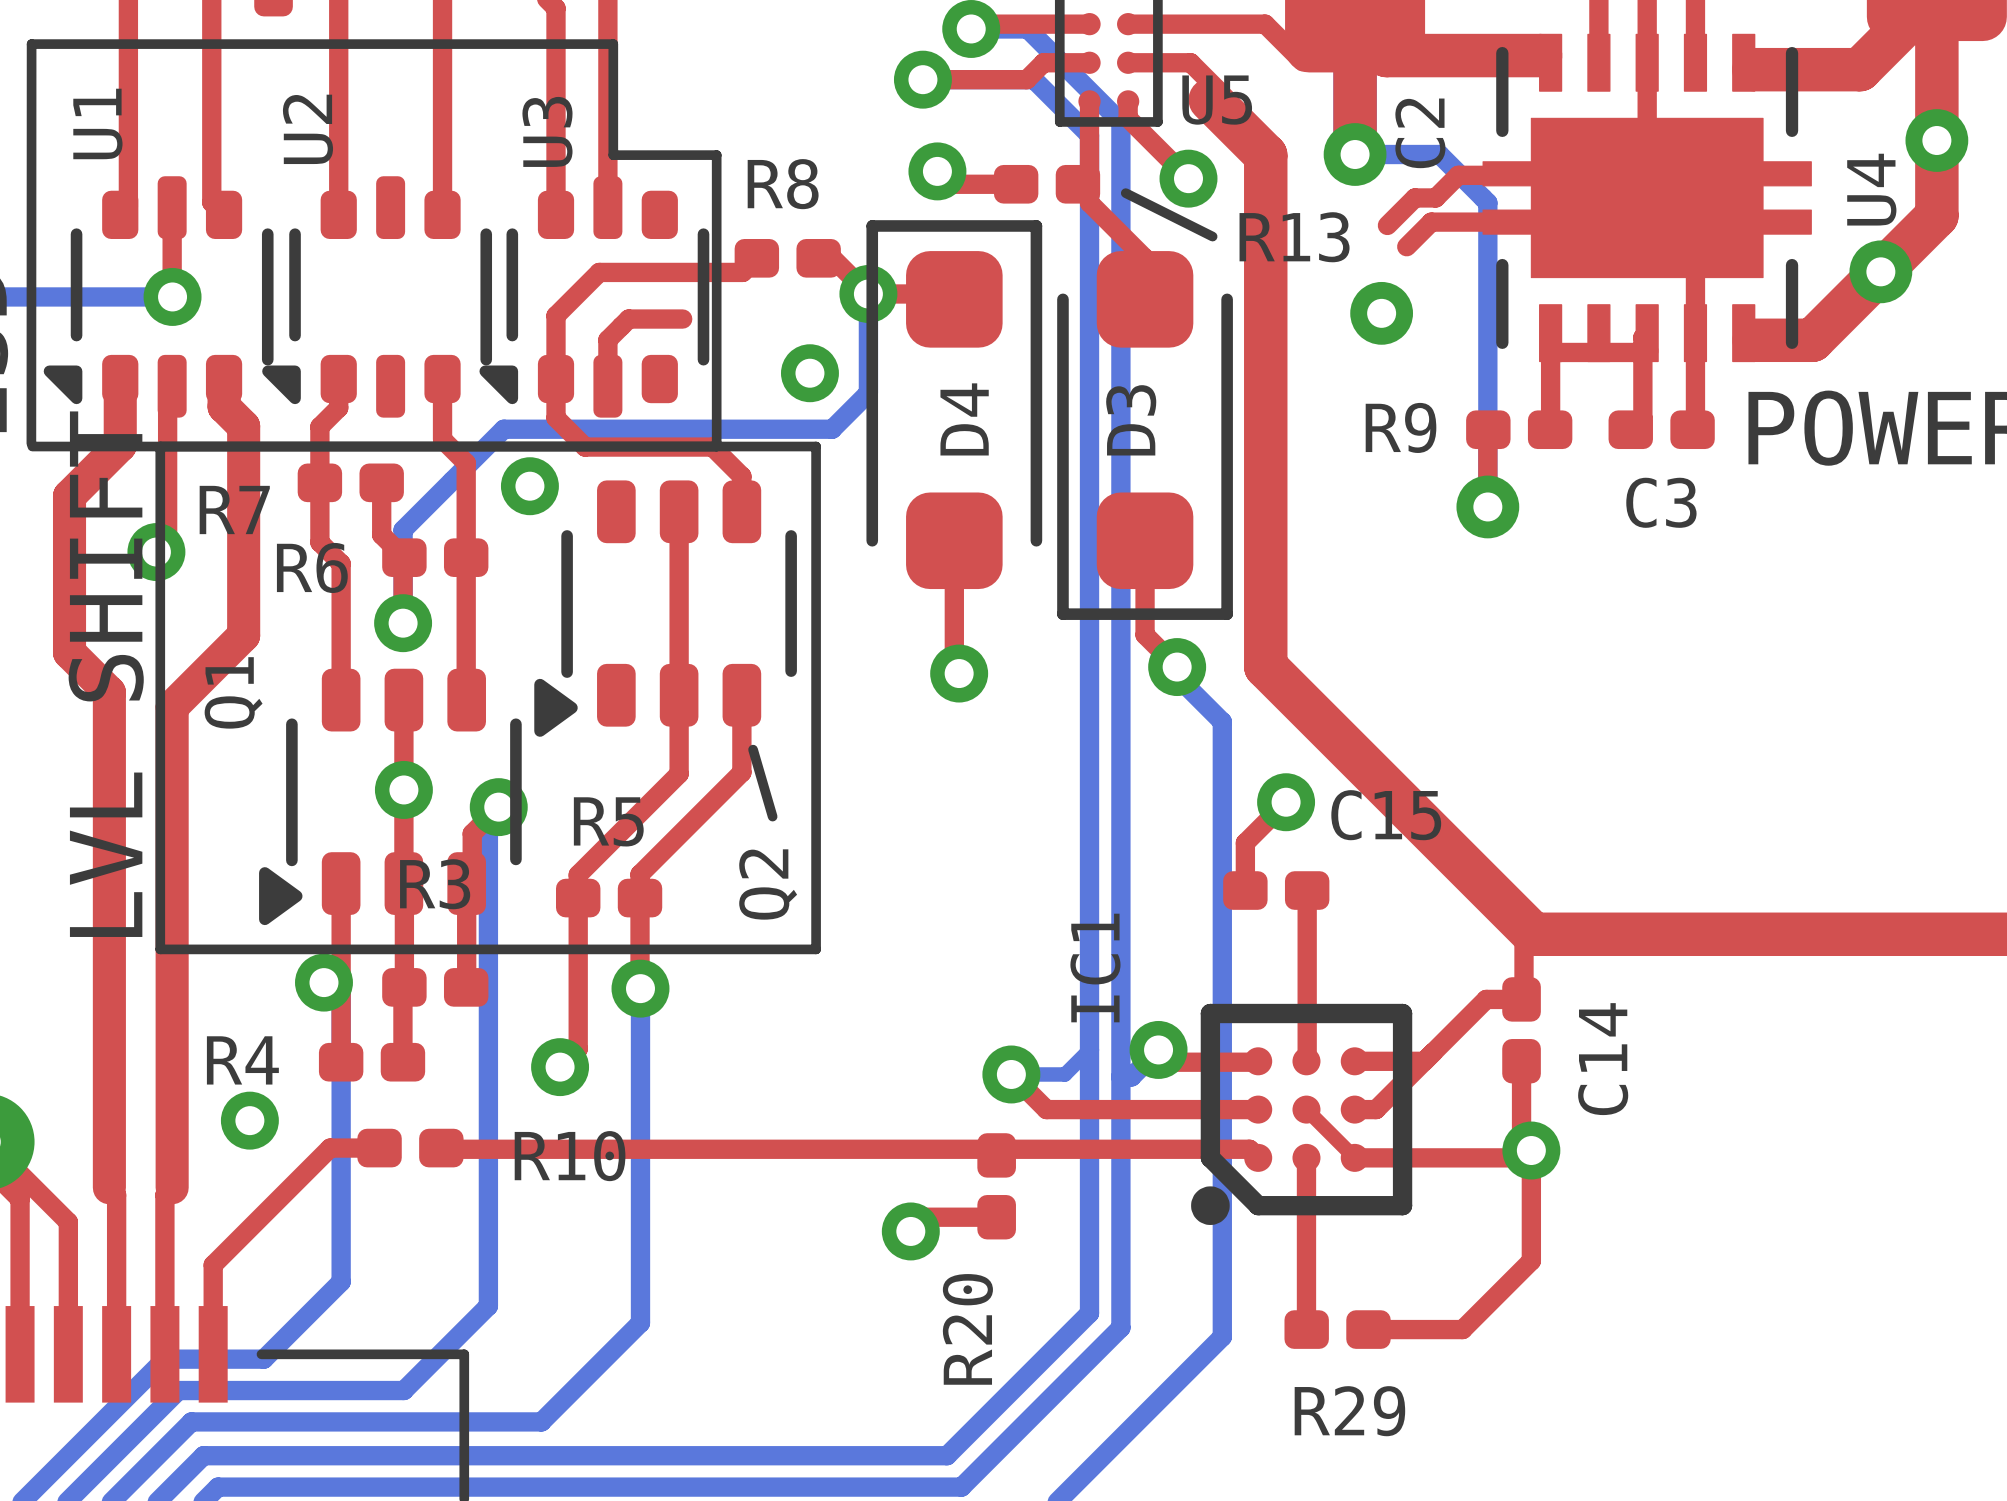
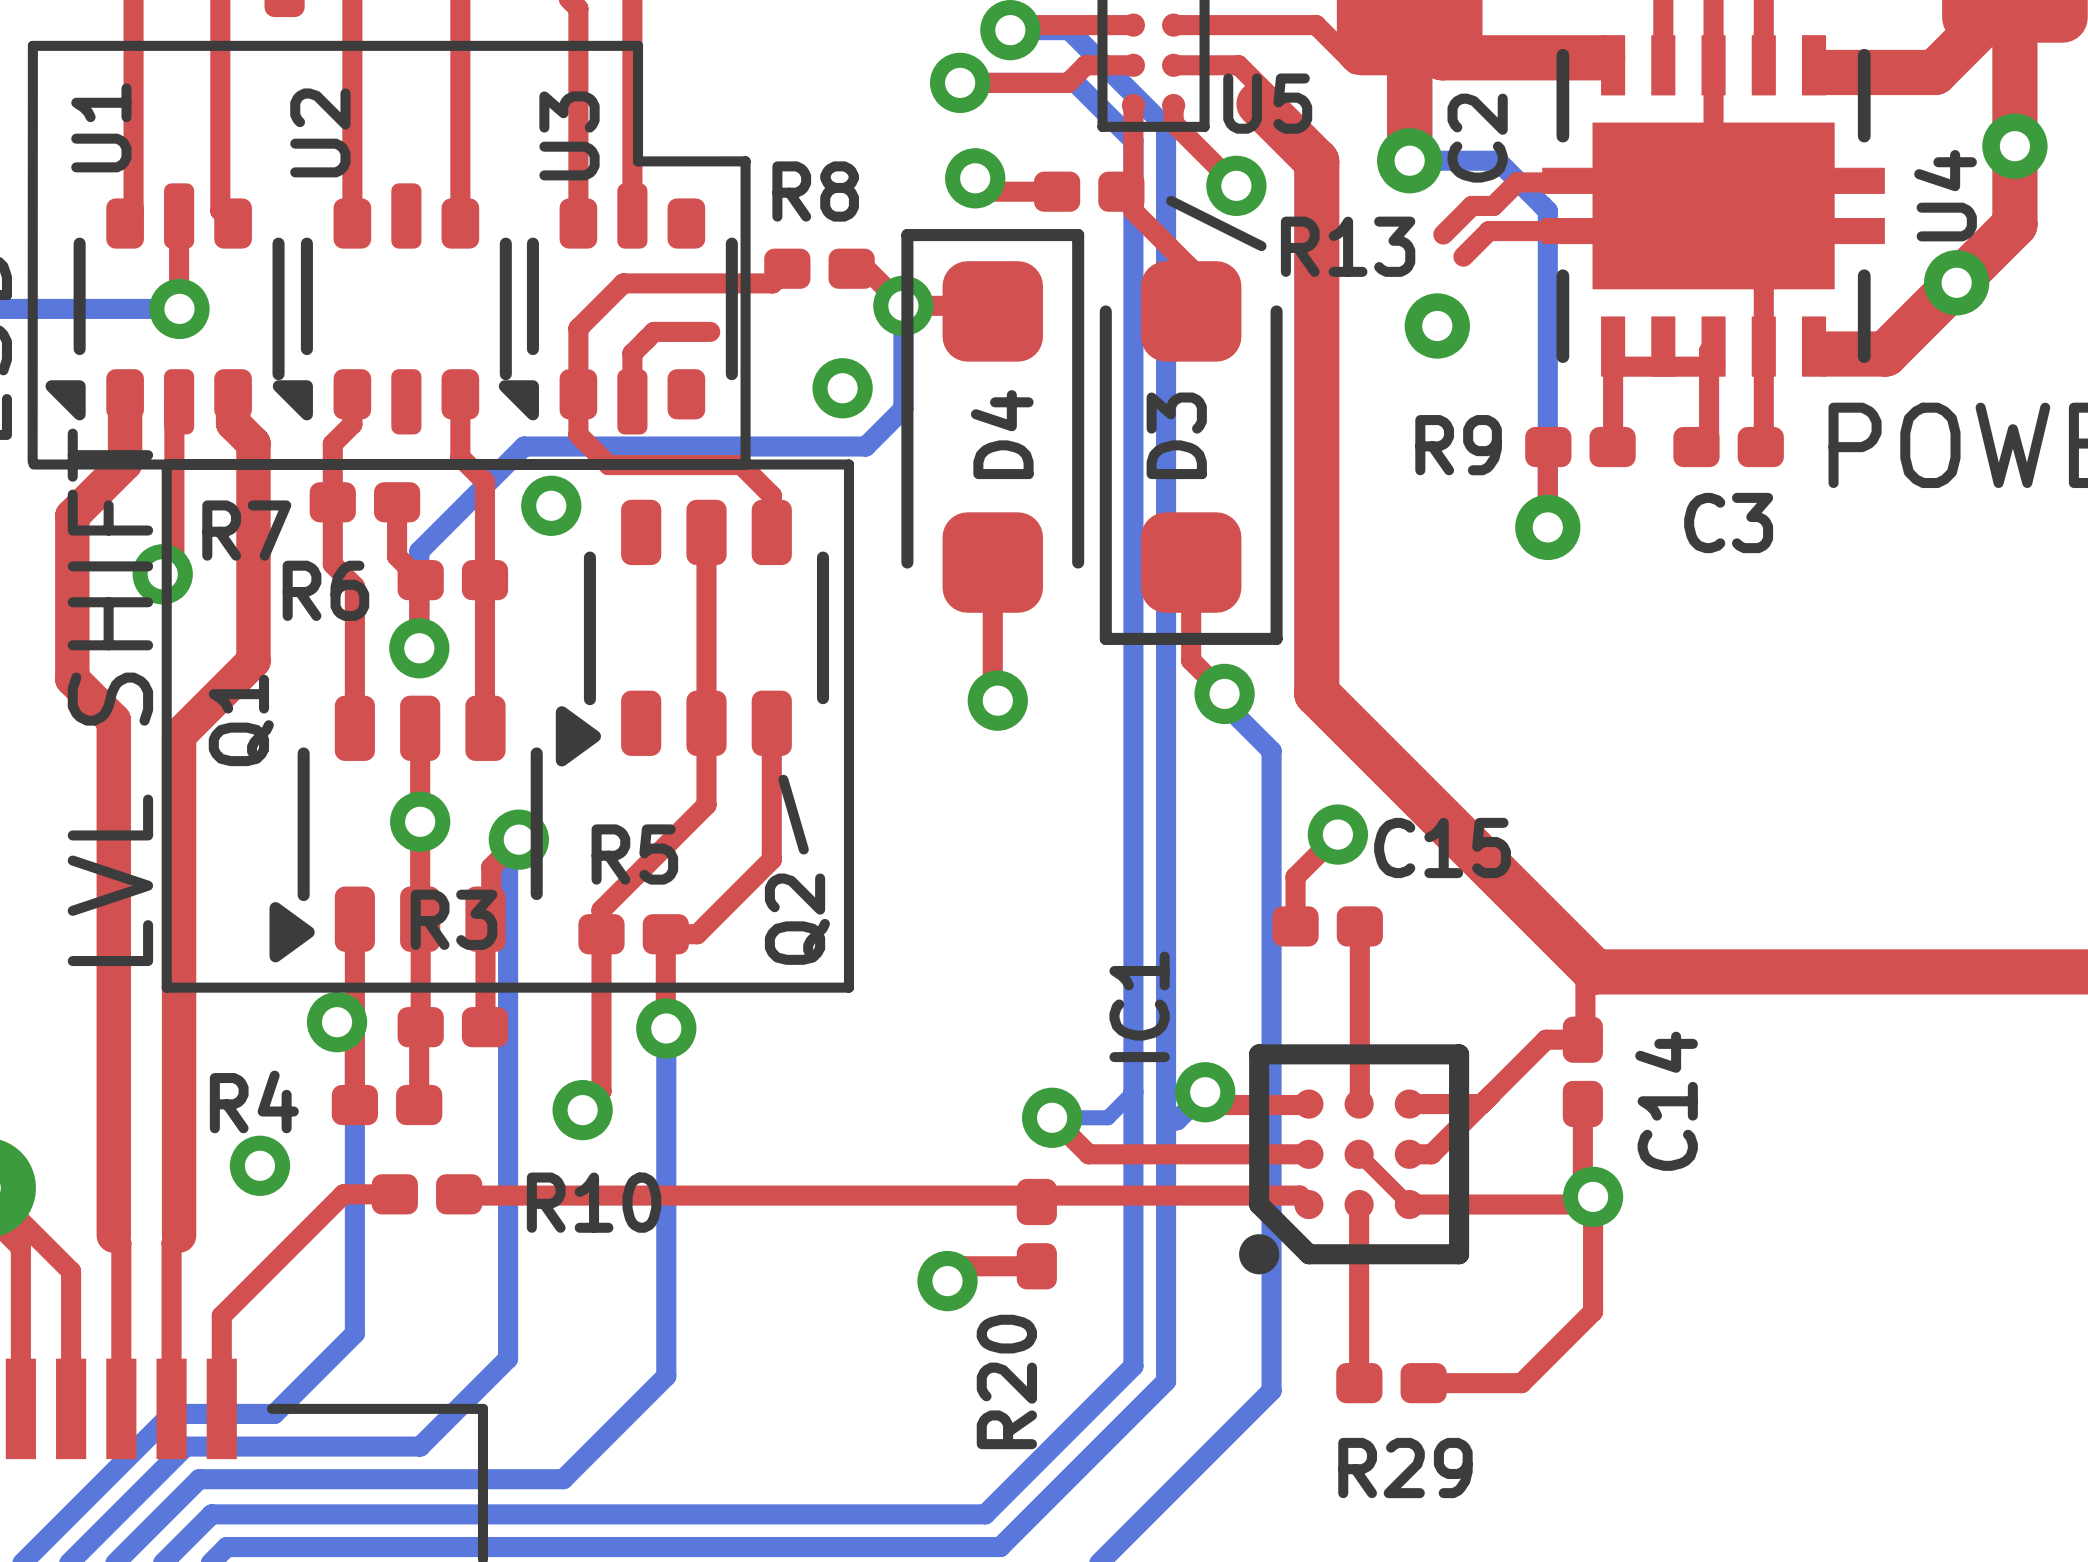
top track: (741, 772) (640, 874) (640, 898) -> (771, 803) (771, 859) (697, 934) (665, 934)

